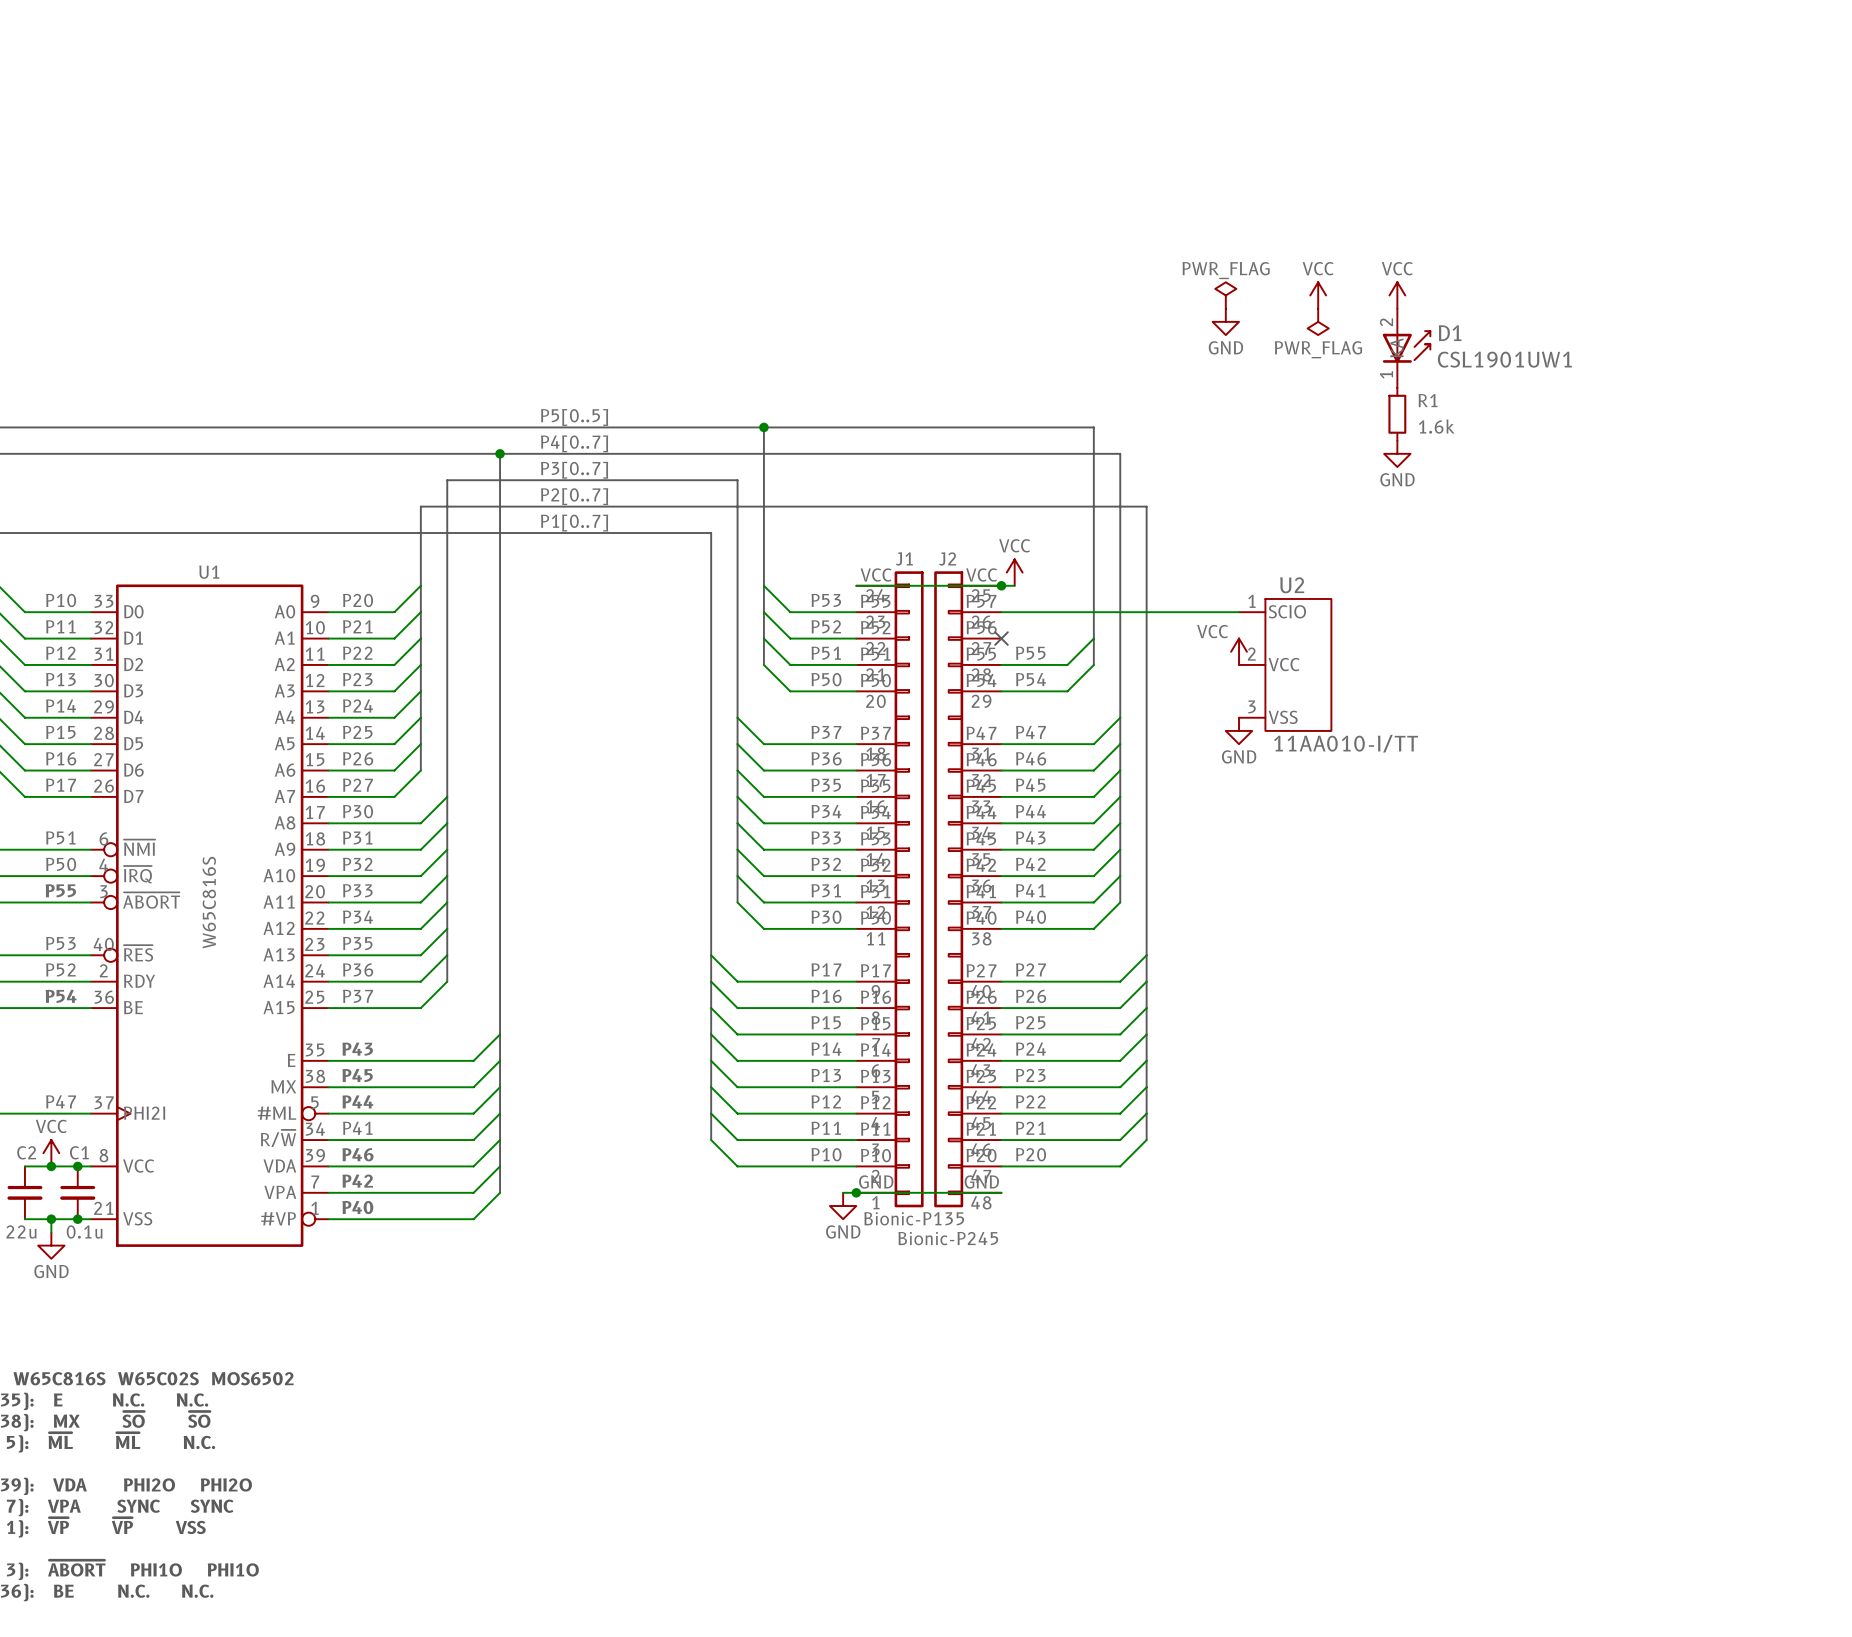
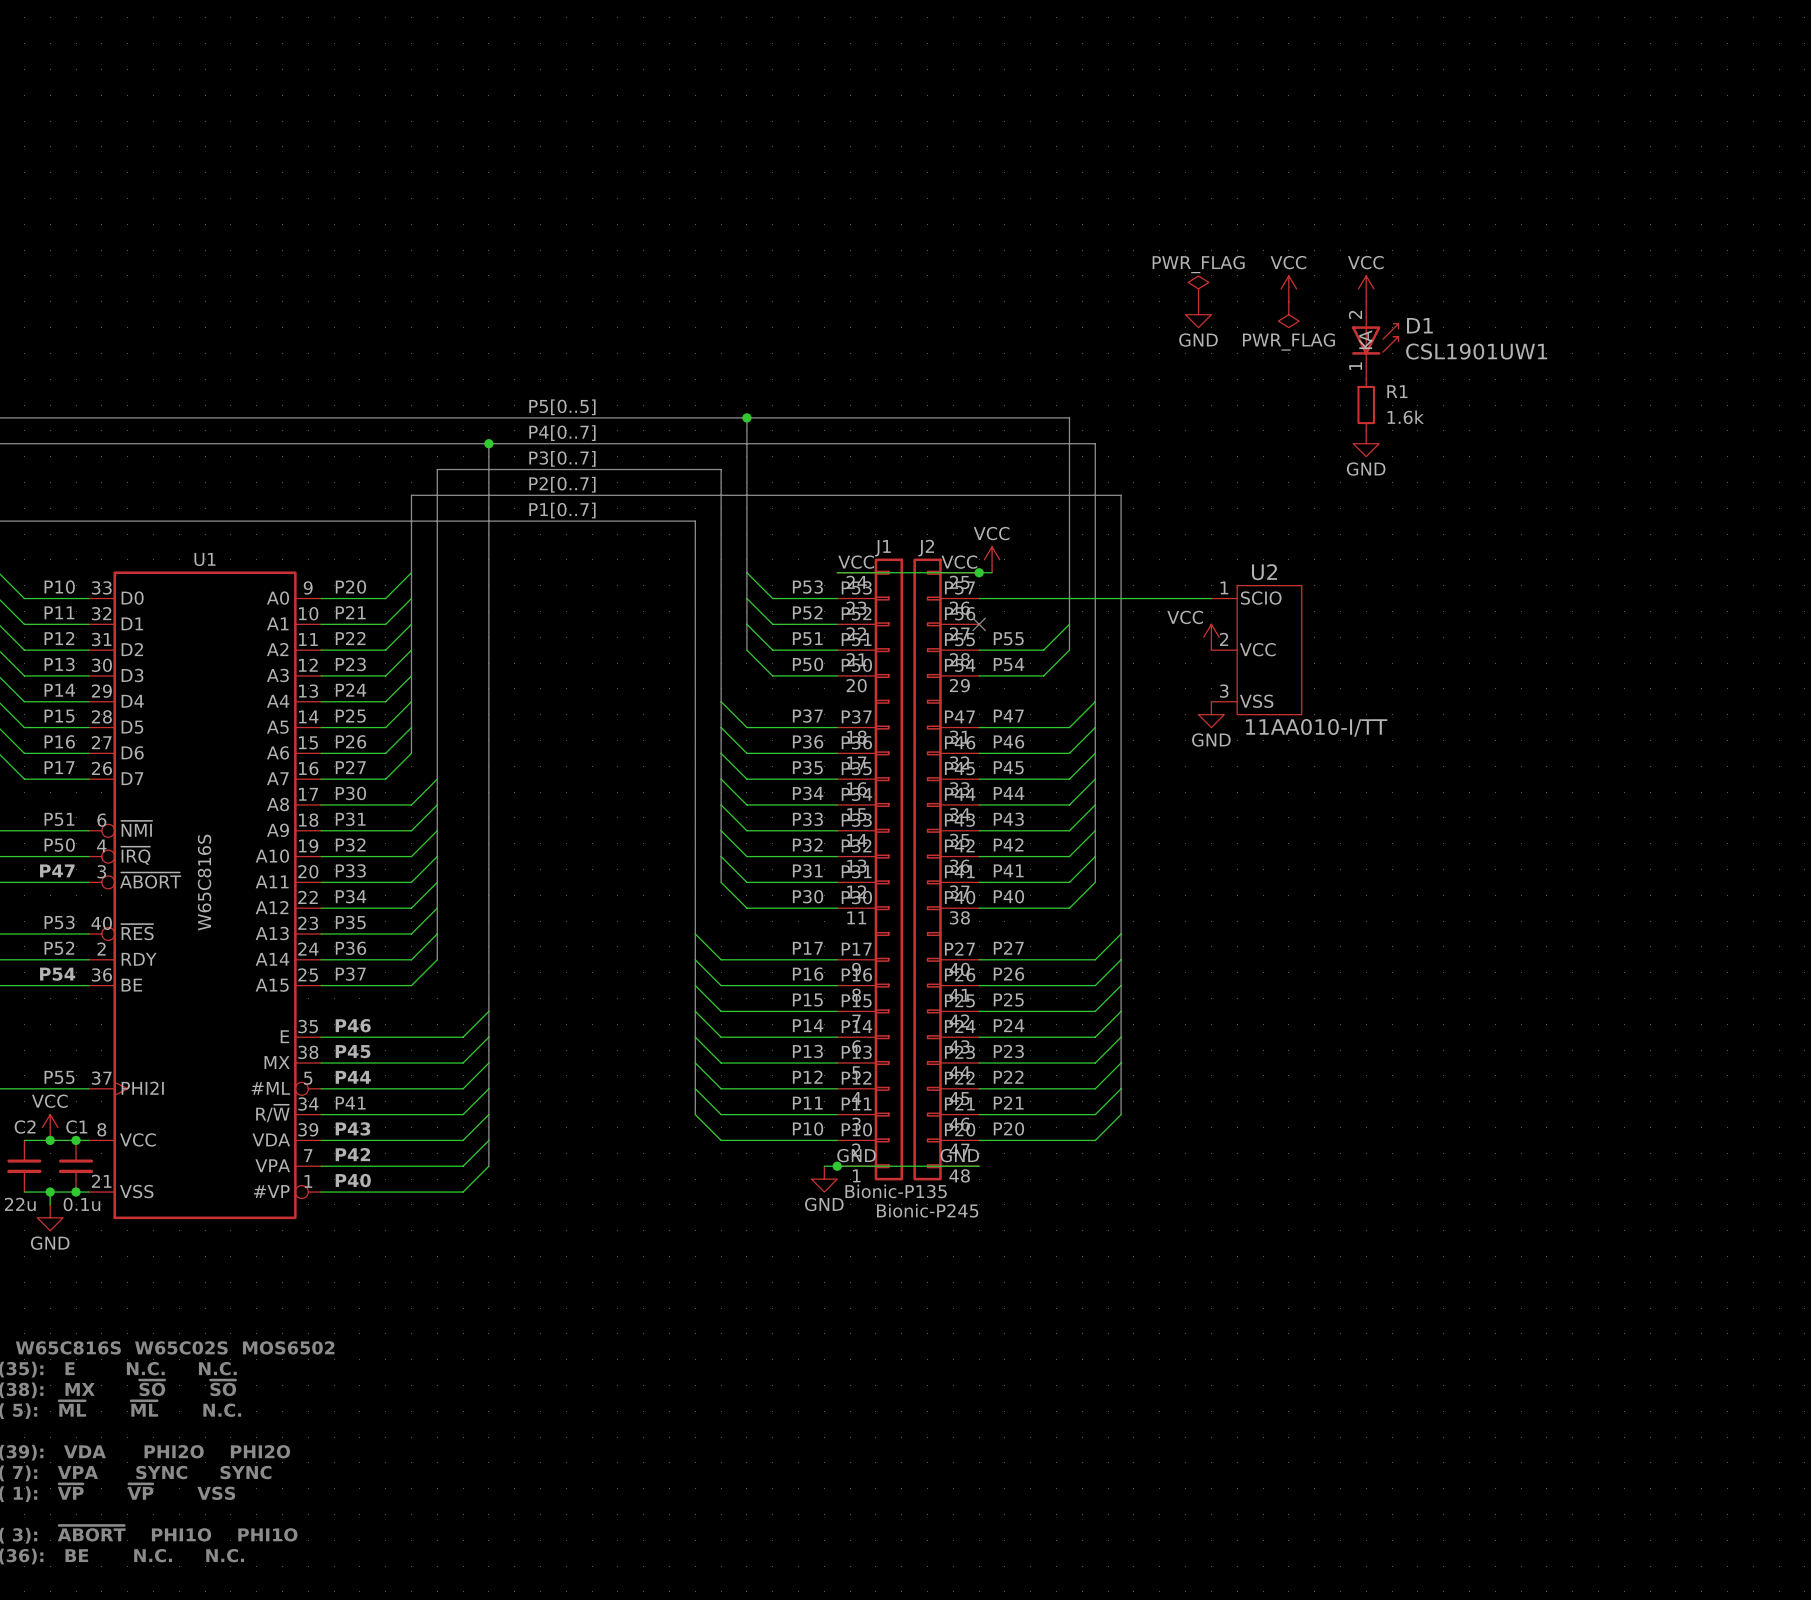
label: P55 (60, 890) -> P47 (57, 870)
label: P43 (357, 1049) -> P46 (353, 1025)
label: P47 (61, 1101) -> P55 (59, 1077)
label: P46 (357, 1154) -> P43 (352, 1128)

